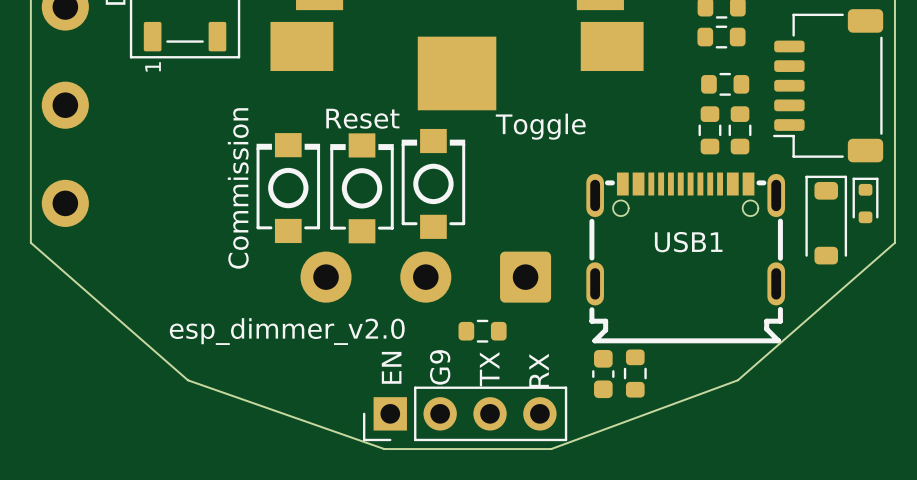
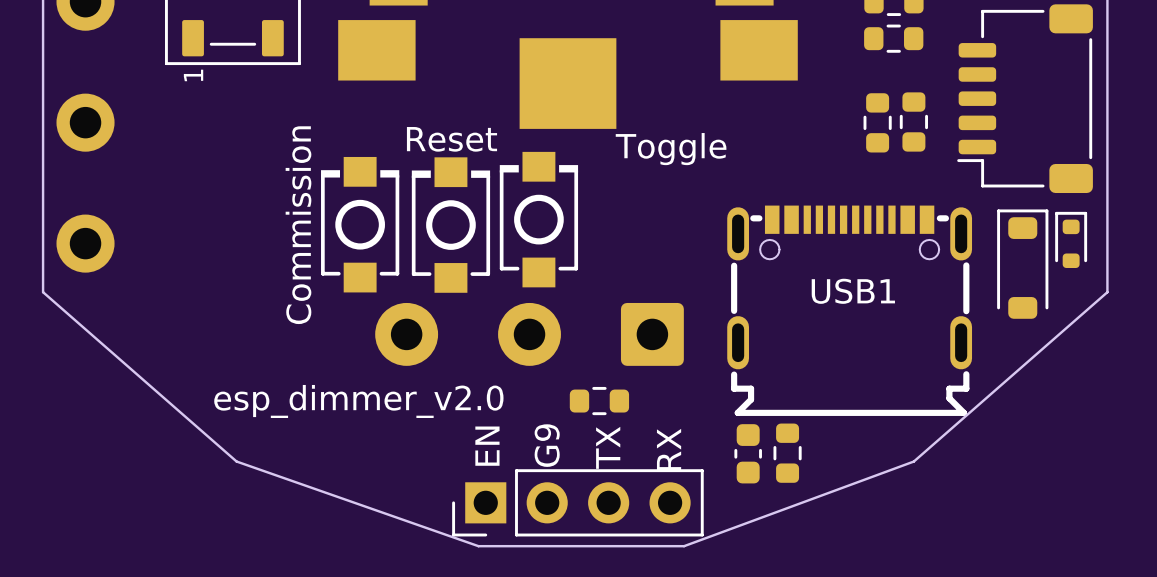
part: (725, 84) -> none
part: none -> (913, 121)
part: none -> (877, 122)
part: (709, 130) -> none
part: (740, 130) -> none

